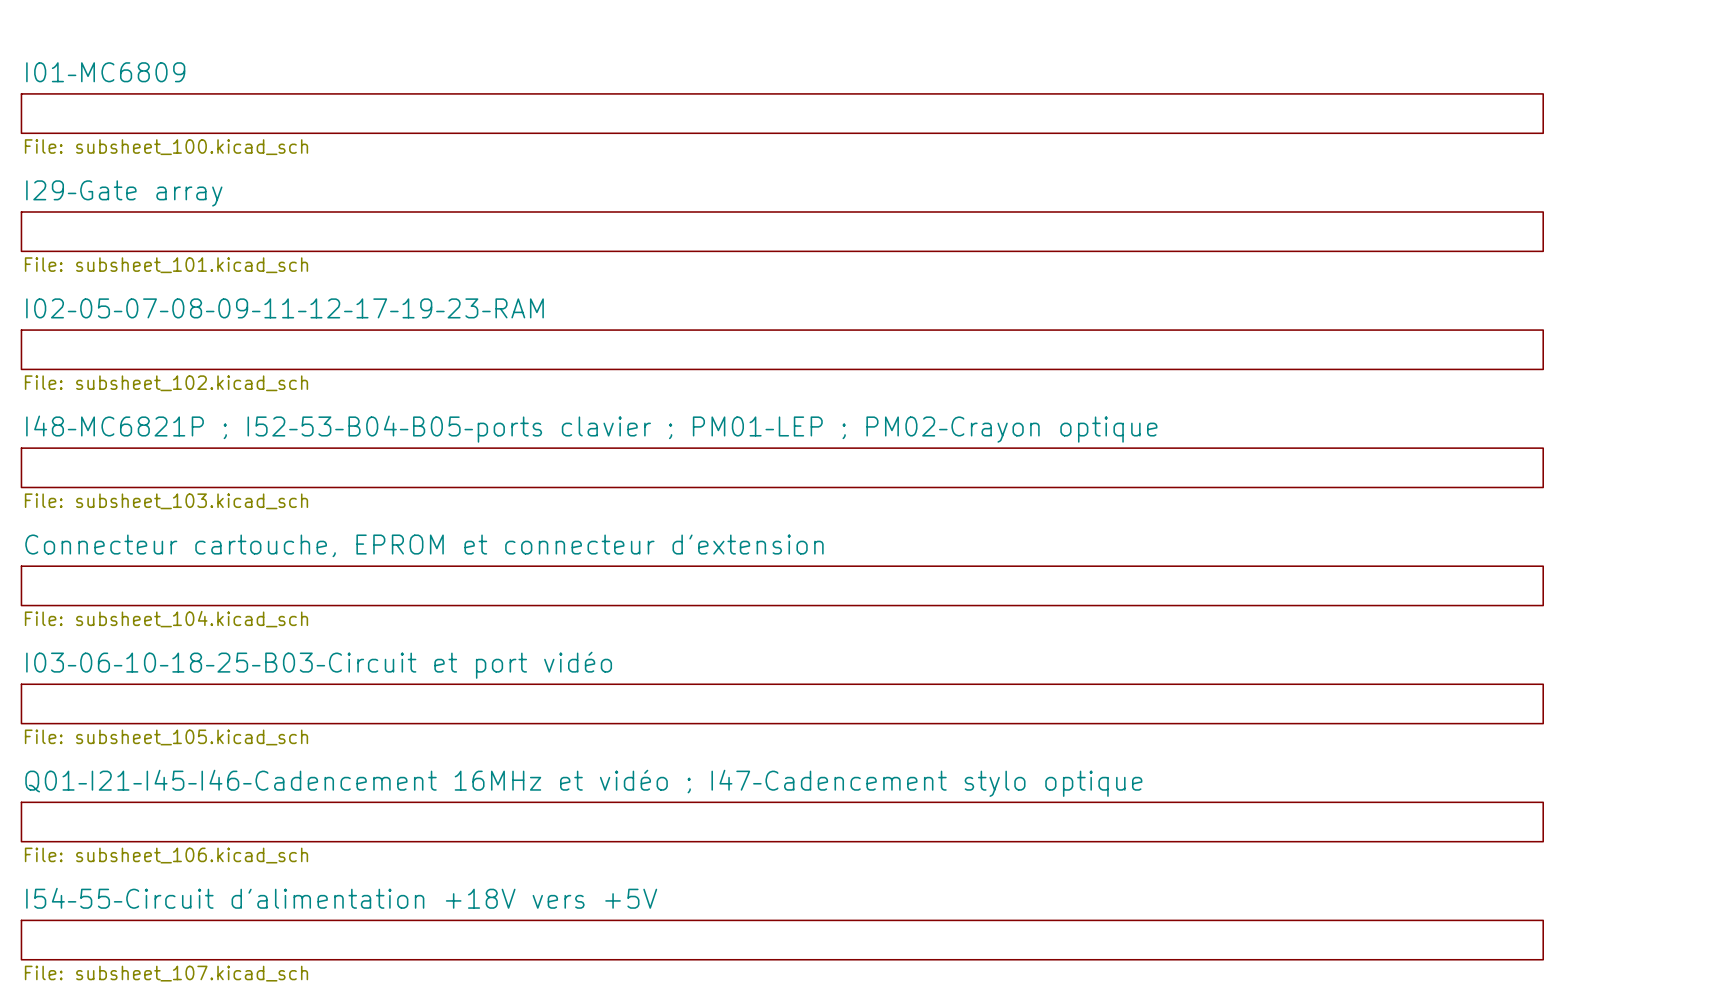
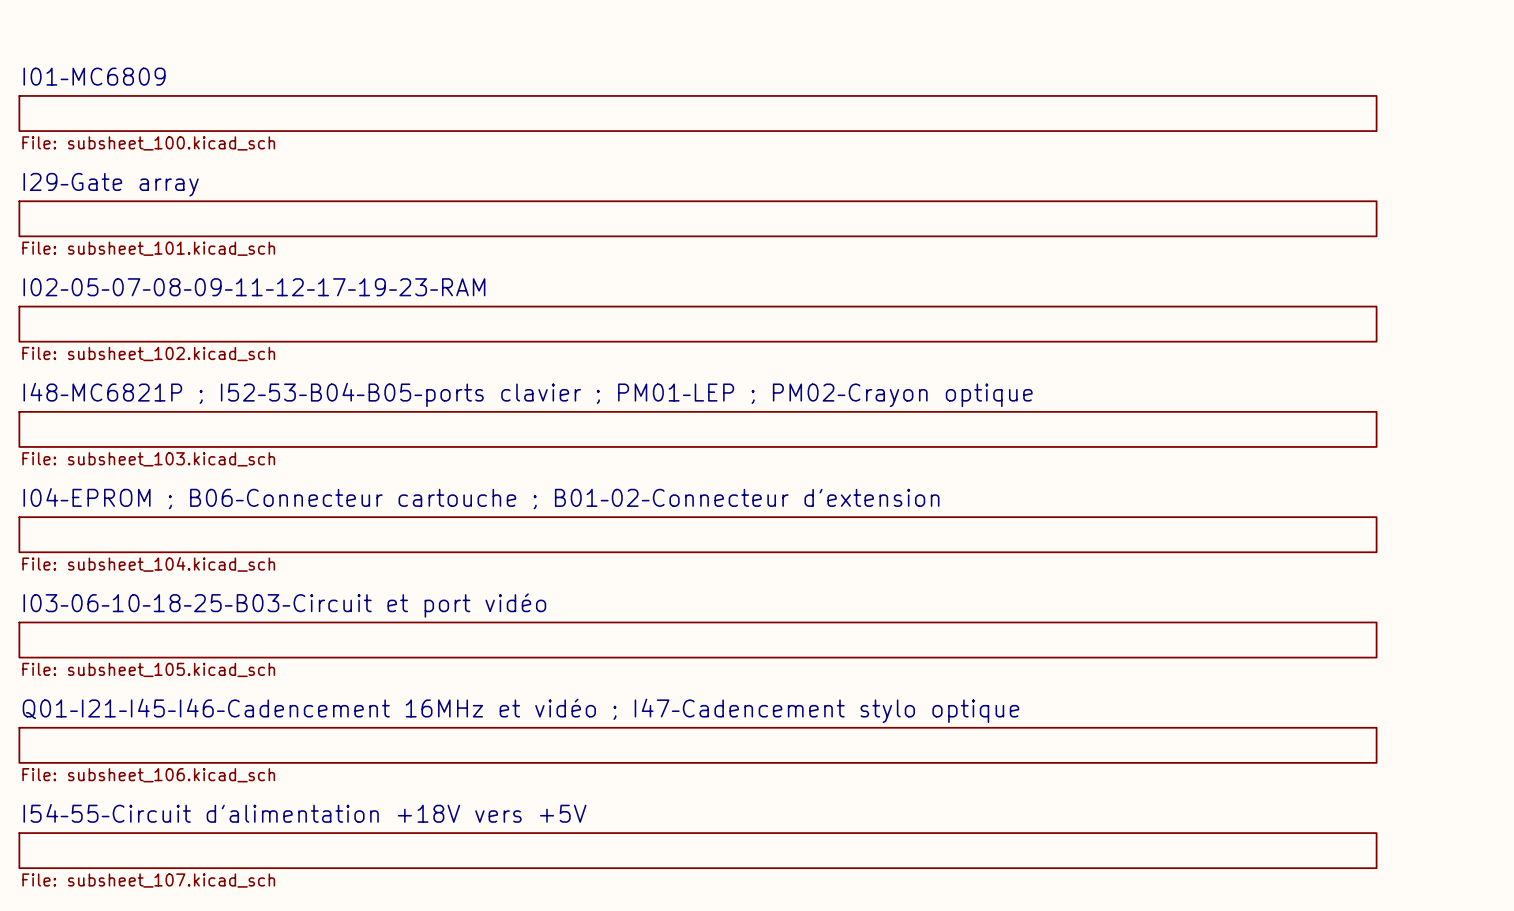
sheet Connecteur cartouche, EPROM et connecteur d'extension name: Connecteur cartouche, EPROM et connecteur d'extension (424, 545) -> I04–EPROM ; B06–Connecteur cartouche ; B01–02–Connecteur d'extension (481, 498)

